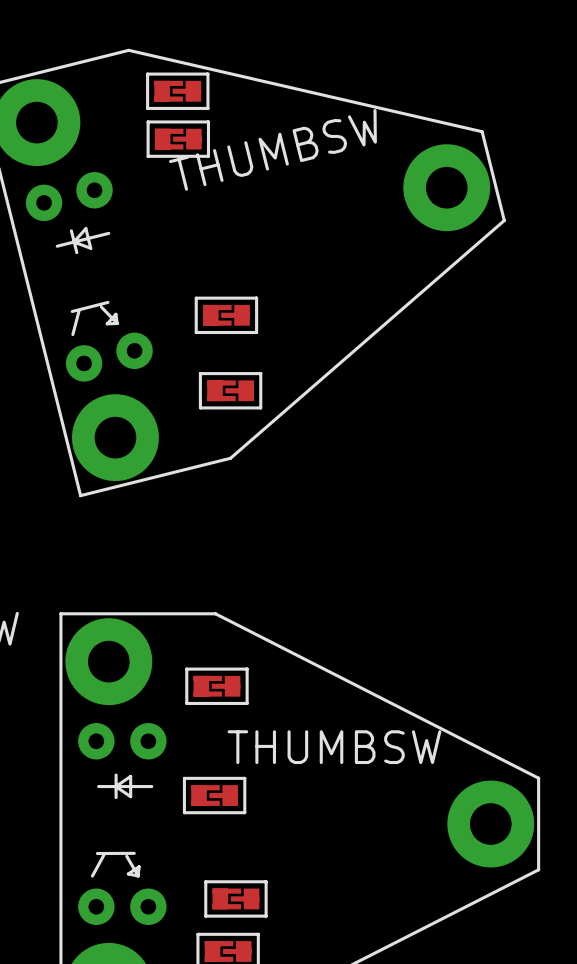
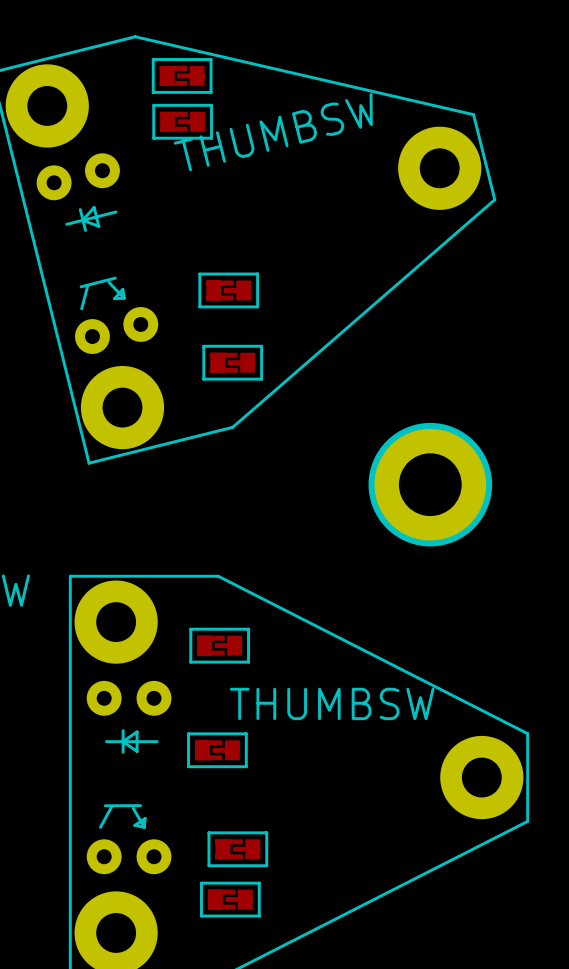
part: none -> (430, 484)

